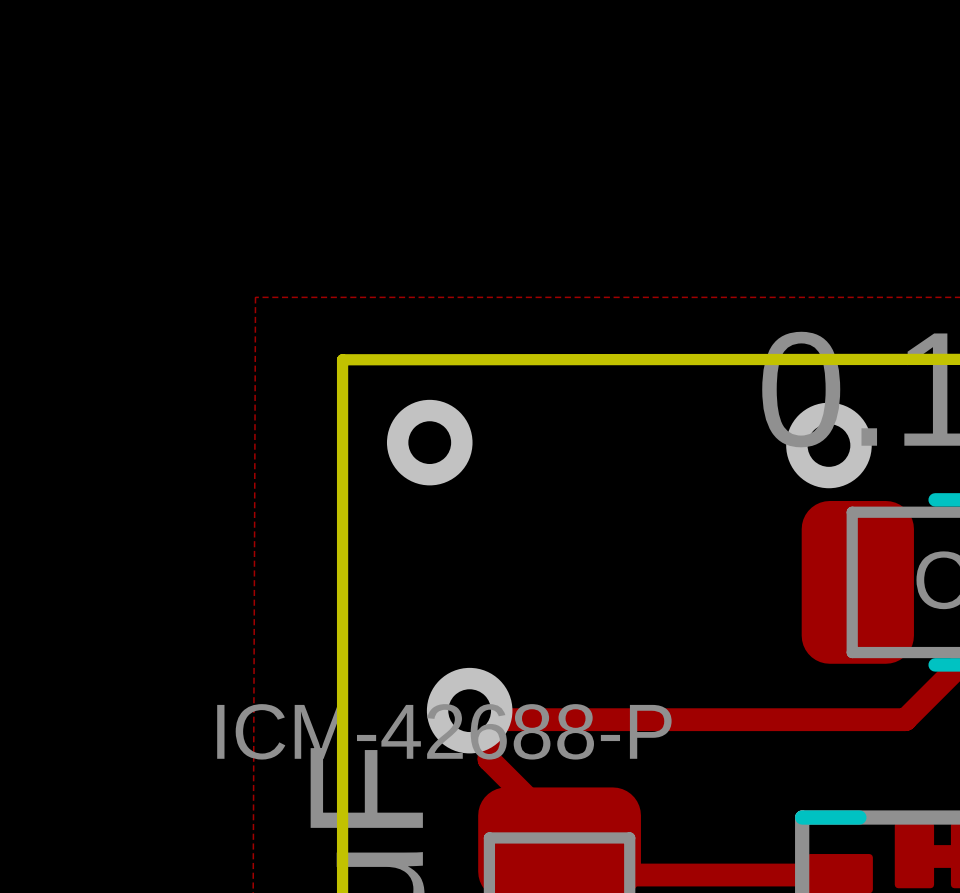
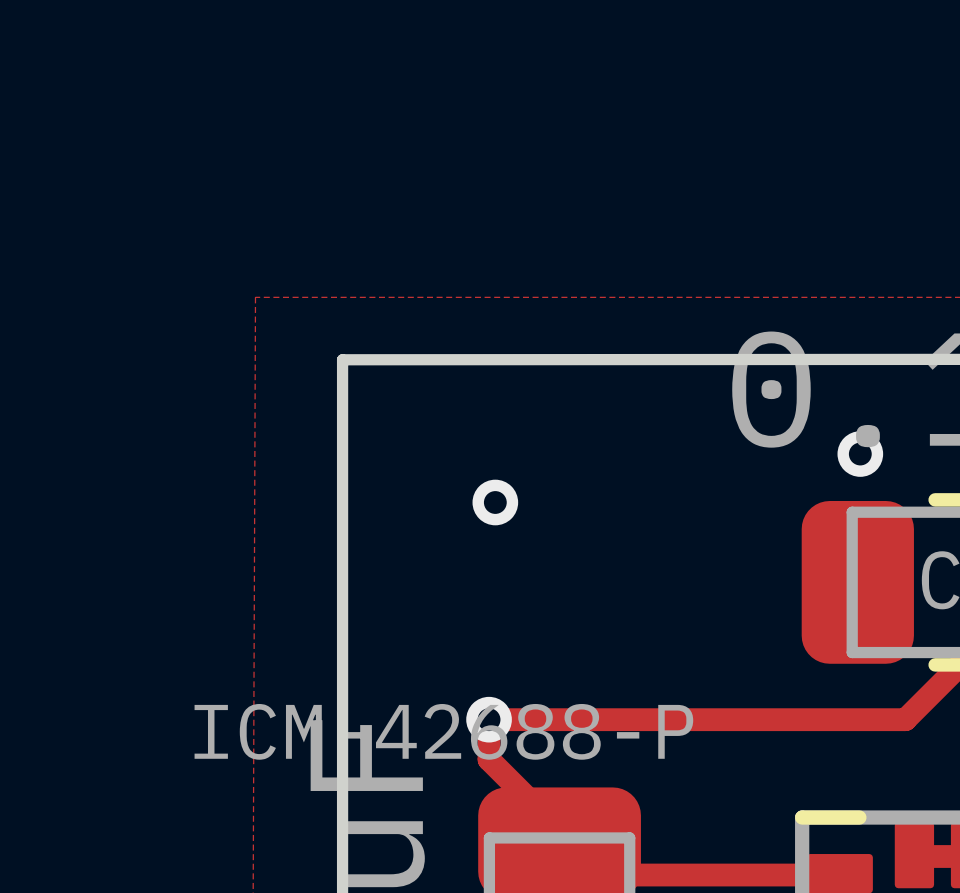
via size: [786, 402, 872, 489] -> [837, 431, 884, 477]
via position: (429, 442) -> (495, 502)
via size: [426, 667, 513, 754] -> [466, 696, 512, 743]

